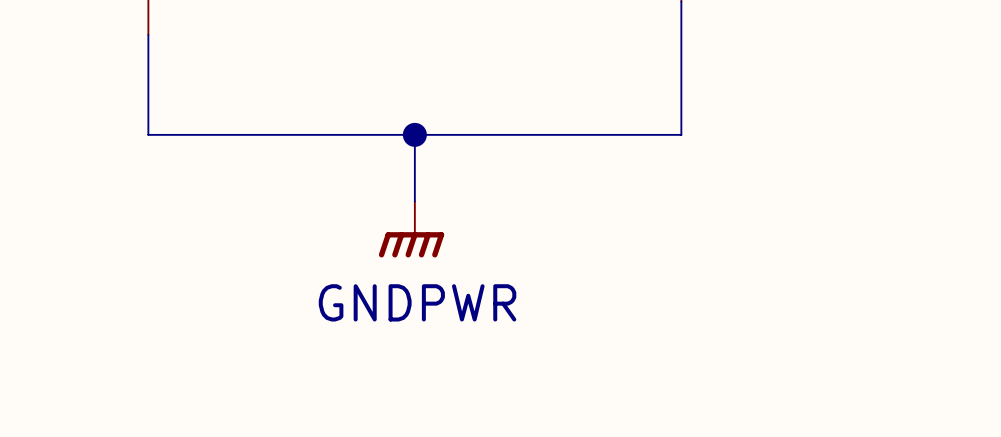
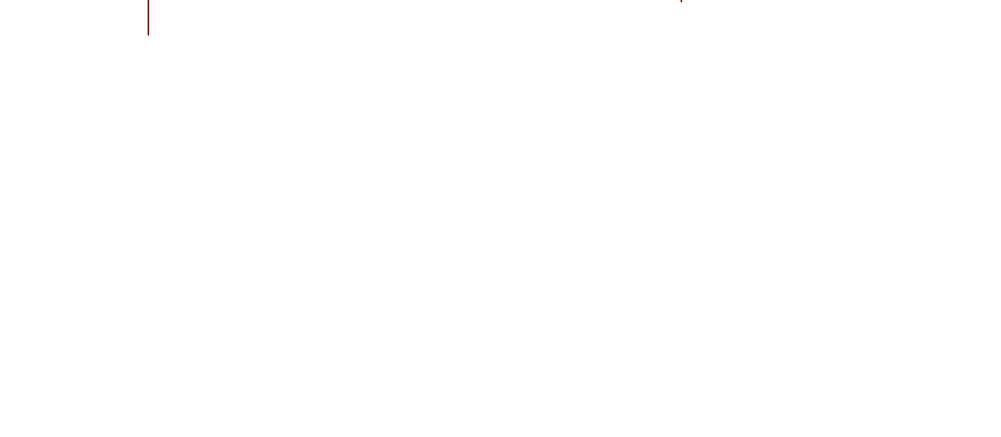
wire: (681, 1) (681, 134) (148, 134) (148, 34) -> none
wire: (414, 134) (414, 201) -> none
junction: (414, 134) -> none
power symbol: GNDPWR (411, 229) -> none

